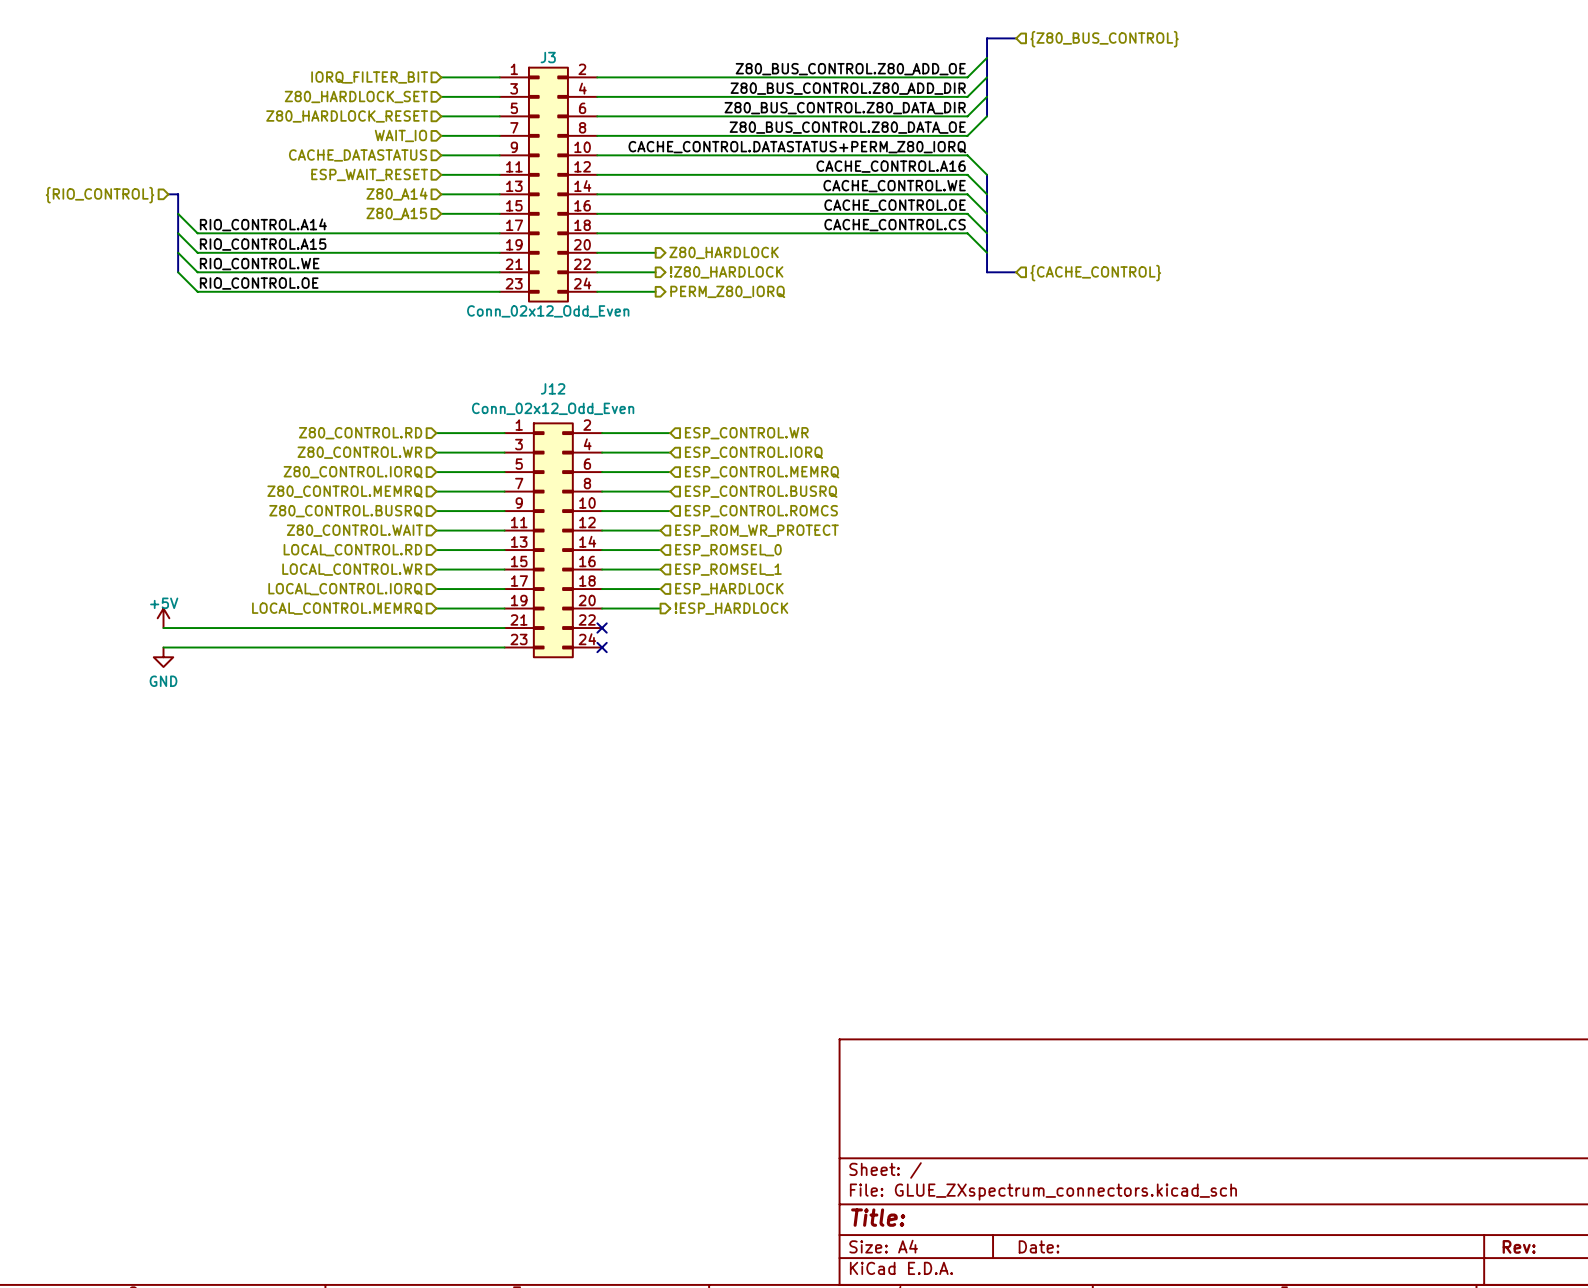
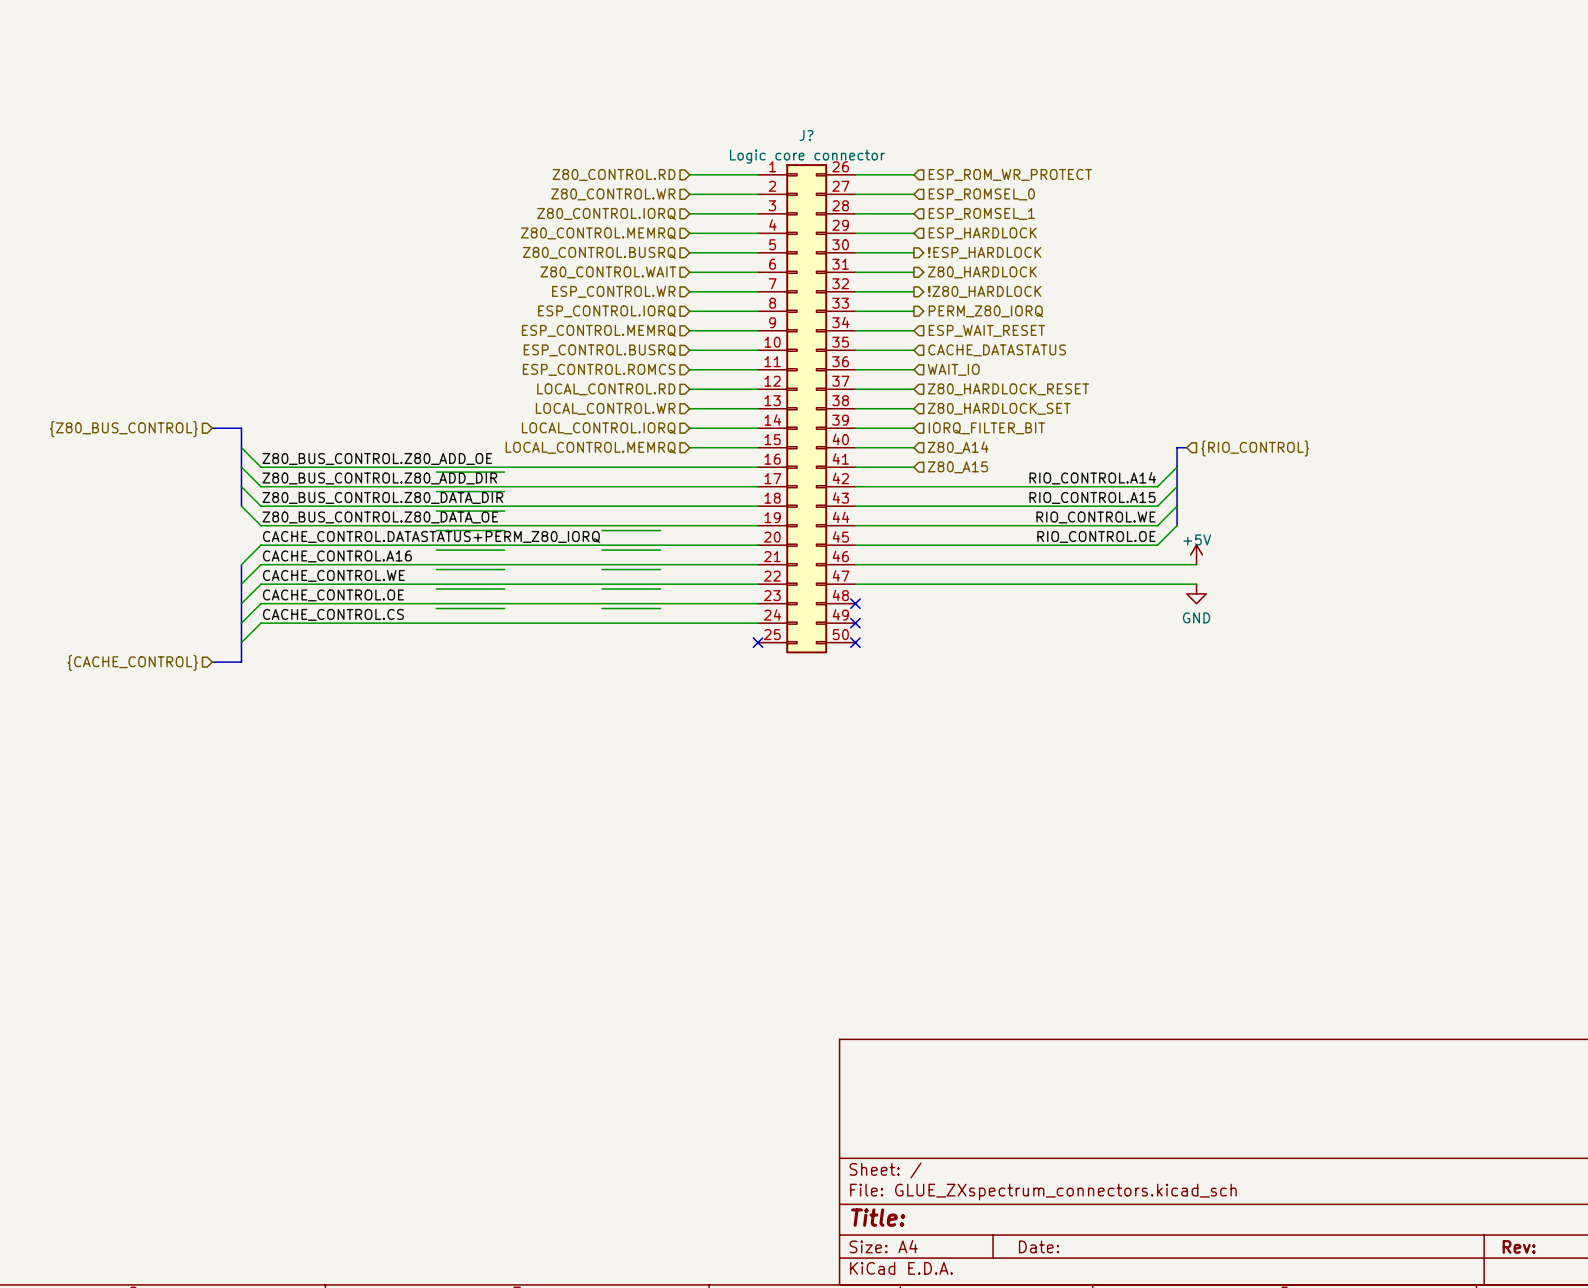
bus: (1016, 38) (987, 38) (987, 116) -> none
hierarchical label: {Z80_BUS_CONTROL} (1104, 39) -> none
wire: (987, 57) (967, 77) (597, 77) -> none
label: Z80_BUS_CONTROL.Z80_ADD_OE (850, 69) -> none
hierarchical label: IORQ_FILTER_BIT (369, 77) -> none
wire: (441, 77) (499, 77) -> none
wire: (987, 77) (967, 96) (597, 96) -> none
label: Z80_BUS_CONTROL.Z80_ADD_DIR (848, 88) -> none
hierarchical label: Z80_HARDLOCK_SET (356, 96) -> none
wire: (441, 96) (499, 96) -> none
wire: (987, 96) (967, 116) (597, 116) -> none
label: Z80_BUS_CONTROL.Z80_DATA_DIR (845, 108) -> none
hierarchical label: Z80_HARDLOCK_RESET (347, 116) -> none
wire: (441, 116) (499, 116) -> none
wire: (987, 116) (967, 135) (597, 135) -> none
label: Z80_BUS_CONTROL.Z80_DATA_OE (847, 127) -> none
hierarchical label: WAIT_IO (400, 135) -> none
wire: (441, 135) (499, 135) -> none
label: CACHE_CONTROL.DATASTATUS+PERM_Z80_IORQ (797, 147) -> none
hierarchical label: CACHE_DATASTATUS (358, 155) -> none
wire: (441, 155) (499, 155) -> none
wire: (597, 155) (967, 155) (987, 174) -> none
label: CACHE_CONTROL.A16 (891, 166) -> none
hierarchical label: ESP_WAIT_RESET (369, 174) -> none
wire: (441, 174) (499, 174) -> none
wire: (597, 174) (689, 174) -> none
hierarchical label: none -> Z80_CONTROL.RD (613, 174)
wire: (913, 174) (967, 174) (987, 194) -> none
bus: (987, 174) (987, 272) (1016, 272) -> none
hierarchical label: none -> ESP_ROM_WR_PROTECT (1010, 174)
J3: Conn_02x12_Odd_Even (548, 184) -> none
label: CACHE_CONTROL.WE (894, 186) -> none
bus: (168, 194) (178, 194) (178, 272) -> none
hierarchical label: Z80_A14 (397, 194) -> none
wire: (441, 194) (499, 194) -> none
wire: (597, 194) (689, 194) -> none
hierarchical label: none -> Z80_CONTROL.WR (613, 194)
wire: (913, 194) (967, 194) (987, 213) -> none
hierarchical label: none -> ESP_ROMSEL_0 (981, 194)
hierarchical label: {RIO_CONTROL} (100, 195) -> none
label: CACHE_CONTROL.OE (895, 205) -> none
wire: (178, 213) (197, 233) (499, 233) -> none
hierarchical label: Z80_A15 (396, 213) -> none
wire: (441, 213) (499, 213) -> none
wire: (597, 213) (689, 213) -> none
hierarchical label: none -> Z80_CONTROL.IORQ (606, 213)
wire: (913, 213) (967, 213) (987, 233) -> none
hierarchical label: none -> ESP_ROMSEL_1 (981, 213)
label: RIO_CONTROL.A14 (263, 224) -> none
label: CACHE_CONTROL.CS (895, 225) -> none
wire: (178, 233) (197, 252) (499, 252) -> none
wire: (597, 233) (689, 233) -> none
hierarchical label: none -> Z80_CONTROL.MEMRQ (598, 233)
wire: (913, 233) (967, 233) (987, 252) -> none
hierarchical label: none -> ESP_HARDLOCK (982, 233)
label: RIO_CONTROL.A15 (263, 244) -> none
wire: (178, 252) (197, 272) (499, 272) -> none
wire: (597, 252) (655, 252) -> none
hierarchical label: none -> Z80_CONTROL.BUSRQ (599, 252)
wire: none -> (689, 252) (758, 252)
hierarchical label: Z80_HARDLOCK (724, 252) -> none
wire: none -> (855, 252) (913, 252)
hierarchical label: none -> !ESP_HARDLOCK (984, 252)
label: RIO_CONTROL.WE (259, 264) -> none
wire: (178, 272) (197, 291) (499, 291) -> none
wire: (597, 272) (655, 272) -> none
hierarchical label: none -> Z80_CONTROL.WAIT (608, 272)
wire: none -> (689, 272) (758, 272)
hierarchical label: !Z80_HARDLOCK (726, 272) -> none
wire: none -> (855, 272) (913, 272)
hierarchical label: none -> Z80_HARDLOCK (982, 272)
hierarchical label: {CACHE_CONTROL} (1095, 273) -> none
label: RIO_CONTROL.OE (259, 283) -> none
wire: (597, 291) (655, 291) -> none
wire: none -> (689, 291) (758, 291)
hierarchical label: PERM_Z80_IORQ (727, 291) -> none
wire: none -> (855, 291) (913, 291)
hierarchical label: none -> !Z80_HARDLOCK (984, 291)
wire: none -> (689, 311) (758, 311)
wire: none -> (855, 311) (913, 311)
hierarchical label: none -> PERM_Z80_IORQ (986, 311)
wire: none -> (689, 330) (758, 330)
wire: none -> (855, 330) (913, 330)
hierarchical label: none -> ESP_WAIT_RESET (986, 330)
wire: none -> (689, 350) (758, 350)
wire: none -> (855, 350) (913, 350)
hierarchical label: none -> CACHE_DATASTATUS (997, 350)
wire: none -> (855, 369) (913, 369)
hierarchical label: none -> WAIT_IO (953, 369)
hierarchical label: none -> LOCAL_CONTROL.RD (606, 389)
wire: none -> (855, 389) (913, 389)
hierarchical label: none -> Z80_HARDLOCK_RESET (1008, 389)
hierarchical label: none -> LOCAL_CONTROL.WR (605, 408)
J?: none -> Logic core connector (806, 408)
wire: none -> (855, 408) (913, 408)
hierarchical label: none -> Z80_HARDLOCK_SET (999, 408)
bus: none -> (212, 428) (241, 428) (241, 506)
hierarchical label: none -> LOCAL_CONTROL.IORQ (598, 428)
wire: none -> (855, 428) (913, 428)
hierarchical label: none -> IORQ_FILTER_BIT (986, 428)
hierarchical label: none -> {Z80_BUS_CONTROL} (123, 429)
hierarchical label: Z80_CONTROL.RD (360, 433) -> none
wire: (436, 433) (504, 433) -> none
wire: (602, 433) (670, 433) -> (689, 369) (758, 369)
hierarchical label rotation: 0° (746, 433) -> 180° (613, 291)
hierarchical label position: ESP_CONTROL.WR (746, 433) -> ESP_CONTROL.WR (613, 291)
wire: none -> (241, 447) (260, 467) (758, 467)
hierarchical label: none -> LOCAL_CONTROL.MEMRQ (590, 447)
wire: none -> (855, 447) (913, 447)
hierarchical label: none -> Z80_A14 (958, 447)
bus: none -> (1186, 447) (1177, 447) (1177, 525)
hierarchical label: none -> {RIO_CONTROL} (1255, 448)
hierarchical label: Z80_CONTROL.WR (359, 452) -> none
wire: (436, 452) (504, 452) -> none
wire: (602, 452) (670, 452) -> (689, 389) (758, 389)
hierarchical label rotation: 0° (753, 452) -> 180° (607, 311)
hierarchical label position: ESP_CONTROL.IORQ (753, 452) -> ESP_CONTROL.IORQ (607, 311)
label: none -> Z80_BUS_CONTROL.Z80_ADD_OE (377, 458)
wire: none -> (241, 467) (260, 486) (758, 486)
wire: none -> (855, 467) (913, 467)
hierarchical label: none -> Z80_A15 (957, 467)
wire: none -> (1177, 467) (1157, 486) (855, 486)
hierarchical label: Z80_CONTROL.IORQ (353, 472) -> none
wire: (602, 472) (670, 472) -> (689, 408) (758, 408)
hierarchical label rotation: 0° (762, 472) -> 180° (598, 330)
hierarchical label position: ESP_CONTROL.MEMRQ (762, 472) -> ESP_CONTROL.MEMRQ (598, 330)
label: none -> Z80_BUS_CONTROL.Z80_ADD_DIR (379, 478)
label: none -> RIO_CONTROL.A14 (1092, 478)
wire: none -> (241, 486) (260, 506) (758, 506)
wire: none -> (1177, 486) (1157, 506) (855, 506)
hierarchical label: Z80_CONTROL.MEMRQ (345, 491) -> none
wire: (602, 491) (670, 491) -> (689, 428) (758, 428)
hierarchical label rotation: 0° (761, 491) -> 180° (599, 350)
hierarchical label position: ESP_CONTROL.BUSRQ (761, 491) -> ESP_CONTROL.BUSRQ (599, 350)
label: none -> Z80_BUS_CONTROL.Z80_DATA_DIR (382, 497)
label: none -> RIO_CONTROL.A15 (1092, 497)
wire: none -> (241, 506) (260, 525) (758, 525)
wire: none -> (1177, 506) (1157, 525) (855, 525)
hierarchical label: Z80_CONTROL.BUSRQ (345, 511) -> none
wire: (602, 511) (670, 511) -> (689, 447) (758, 447)
hierarchical label rotation: 0° (761, 511) -> 180° (599, 369)
hierarchical label position: ESP_CONTROL.ROMCS (761, 511) -> ESP_CONTROL.ROMCS (599, 369)
label: none -> Z80_BUS_CONTROL.Z80_DATA_OE (380, 517)
label: none -> RIO_CONTROL.WE (1096, 517)
wire: none -> (1177, 525) (1157, 545) (855, 545)
hierarchical label: Z80_CONTROL.WAIT (355, 530) -> none
hierarchical label: ESP_ROM_WR_PROTECT (756, 530) -> none
label: none -> CACHE_CONTROL.DATASTATUS+PERM_Z80_IORQ (431, 536)
label: none -> RIO_CONTROL.OE (1096, 536)
J12: Conn_02x12_Odd_Even (553, 540) -> none
wire: none -> (758, 545) (260, 545) (241, 564)
hierarchical label: LOCAL_CONTROL.RD (352, 550) -> none
hierarchical label: ESP_ROMSEL_0 (728, 550) -> none
power symbol: none -> +5V (1196, 554)
label: none -> CACHE_CONTROL.A16 (337, 556)
bus: none -> (241, 564) (241, 662) (212, 662)
wire: none -> (758, 564) (260, 564) (241, 584)
wire: none -> (855, 564) (1196, 564)
hierarchical label: LOCAL_CONTROL.WR (352, 569) -> none
hierarchical label: ESP_ROMSEL_1 (728, 569) -> none
label: none -> CACHE_CONTROL.WE (333, 575)
wire: none -> (758, 584) (260, 584) (241, 603)
wire: none -> (855, 584) (1196, 584)
hierarchical label: LOCAL_CONTROL.IORQ (345, 589) -> none
hierarchical label: ESP_HARDLOCK (729, 589) -> none
power symbol: none -> GND (1196, 593)
label: none -> CACHE_CONTROL.OE (333, 595)
wire: none -> (758, 603) (260, 603) (241, 623)
no-connect mark: none -> (855, 603)
hierarchical label: LOCAL_CONTROL.MEMRQ (337, 608) -> none
hierarchical label: !ESP_HARDLOCK (731, 608) -> none
label: none -> CACHE_CONTROL.CS (333, 614)
power symbol: +5V (163, 618) -> none
wire: none -> (758, 623) (260, 623) (241, 642)
no-connect mark: none -> (855, 623)
wire: (163, 628) (504, 628) -> none
no-connect mark: (602, 628) -> none
no-connect mark: none -> (758, 642)
no-connect mark: none -> (855, 642)
wire: (163, 647) (504, 647) -> none
no-connect mark: (602, 647) -> none
power symbol: GND (163, 657) -> none
hierarchical label: none -> {CACHE_CONTROL} (132, 662)

